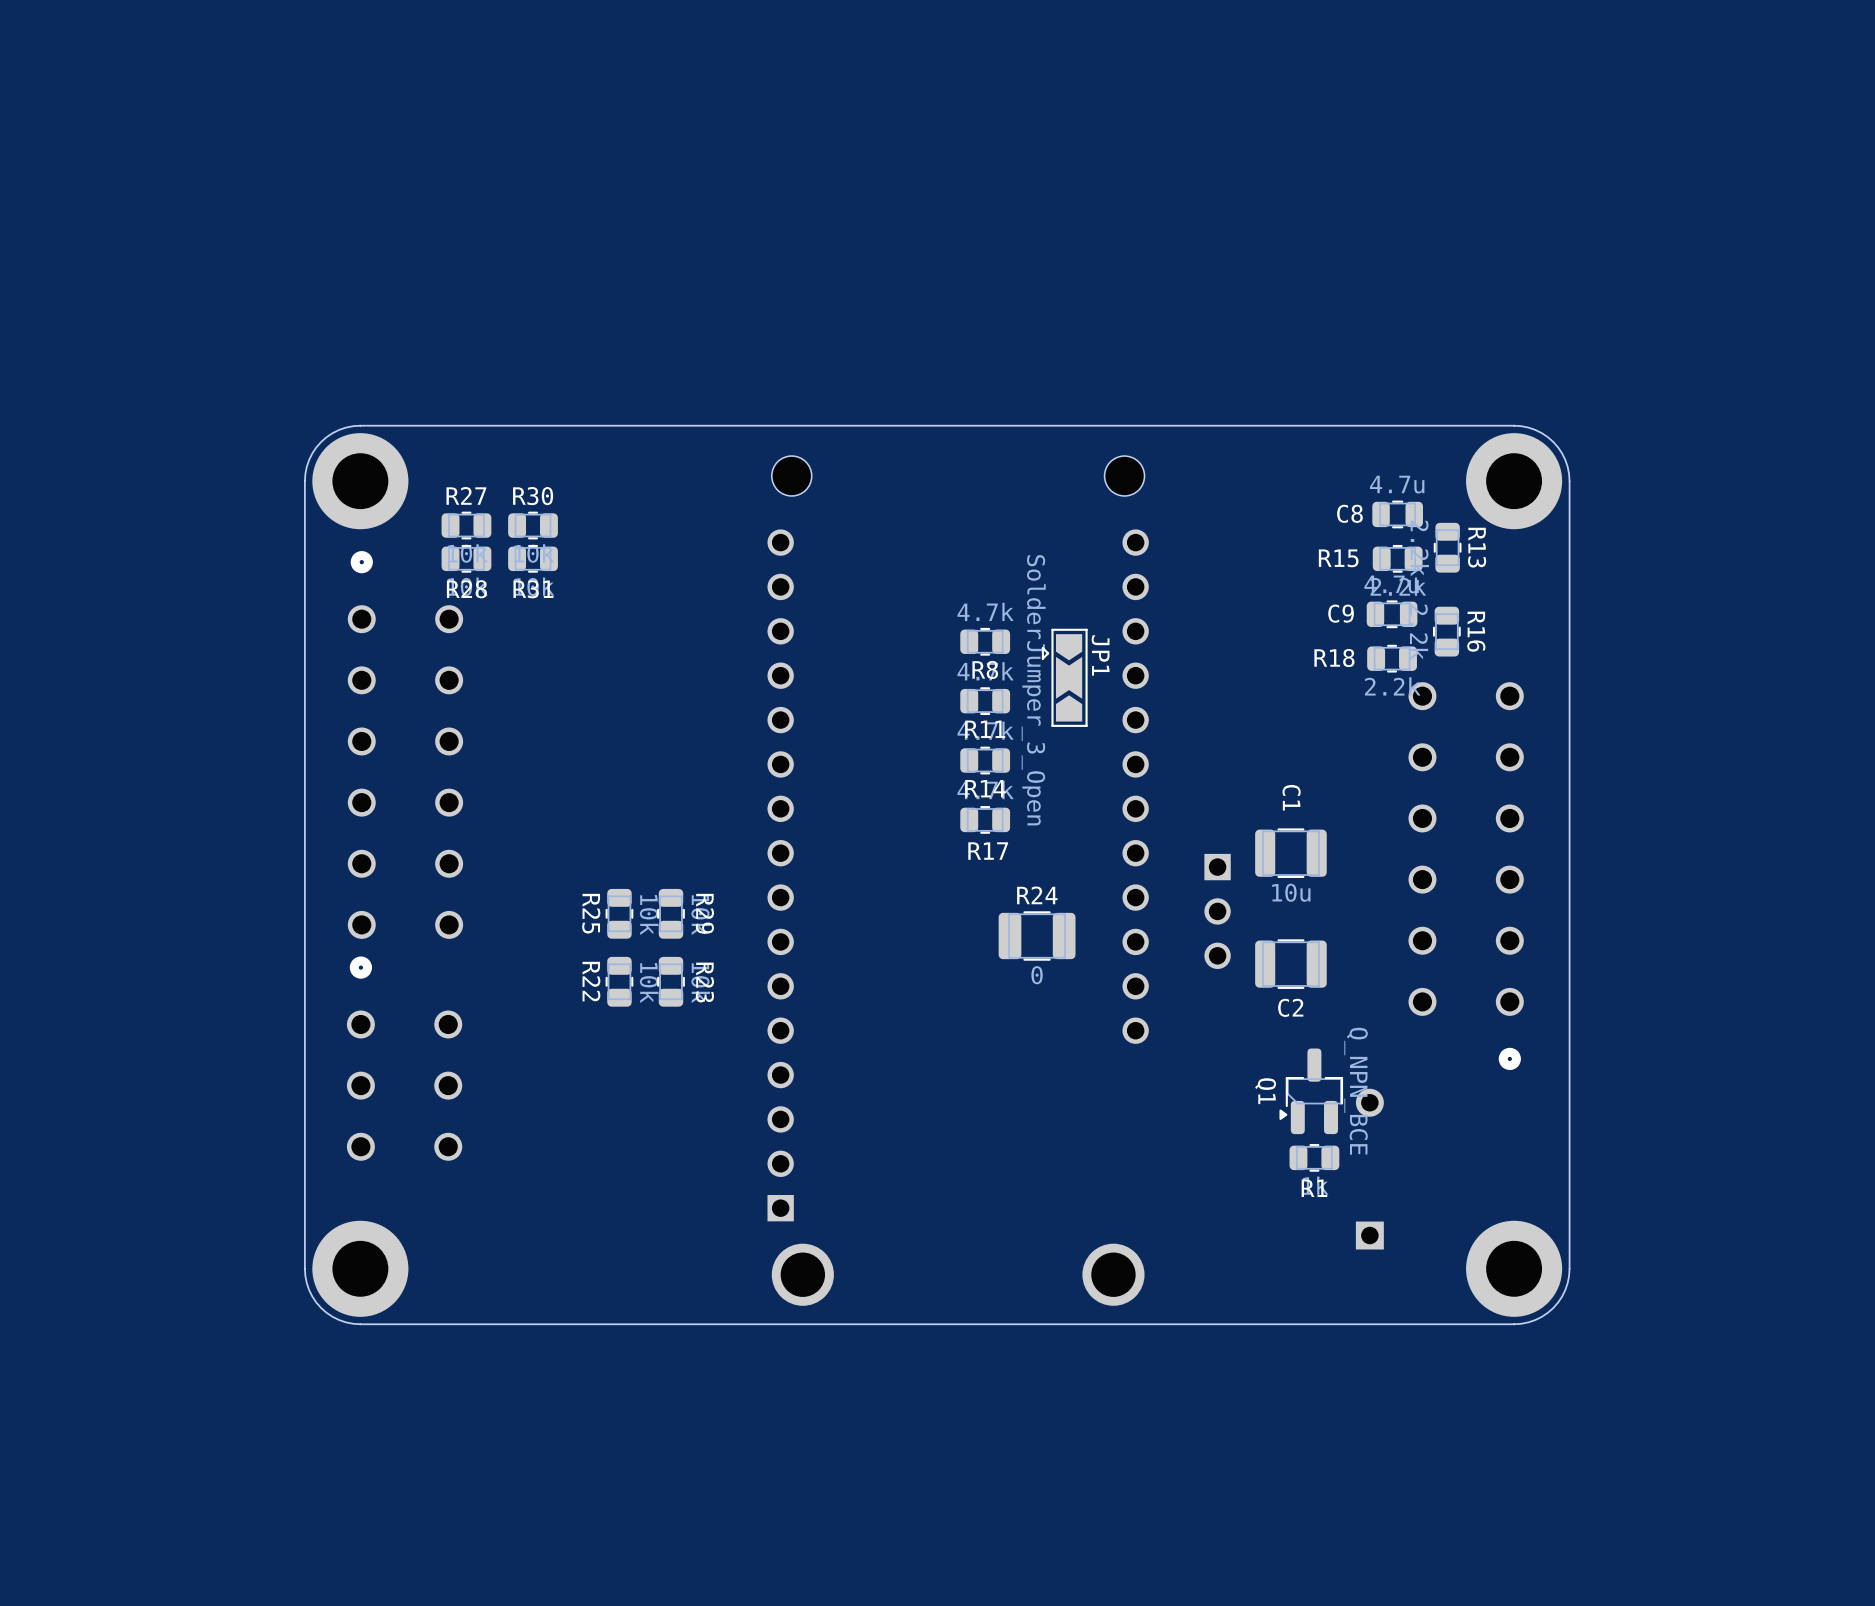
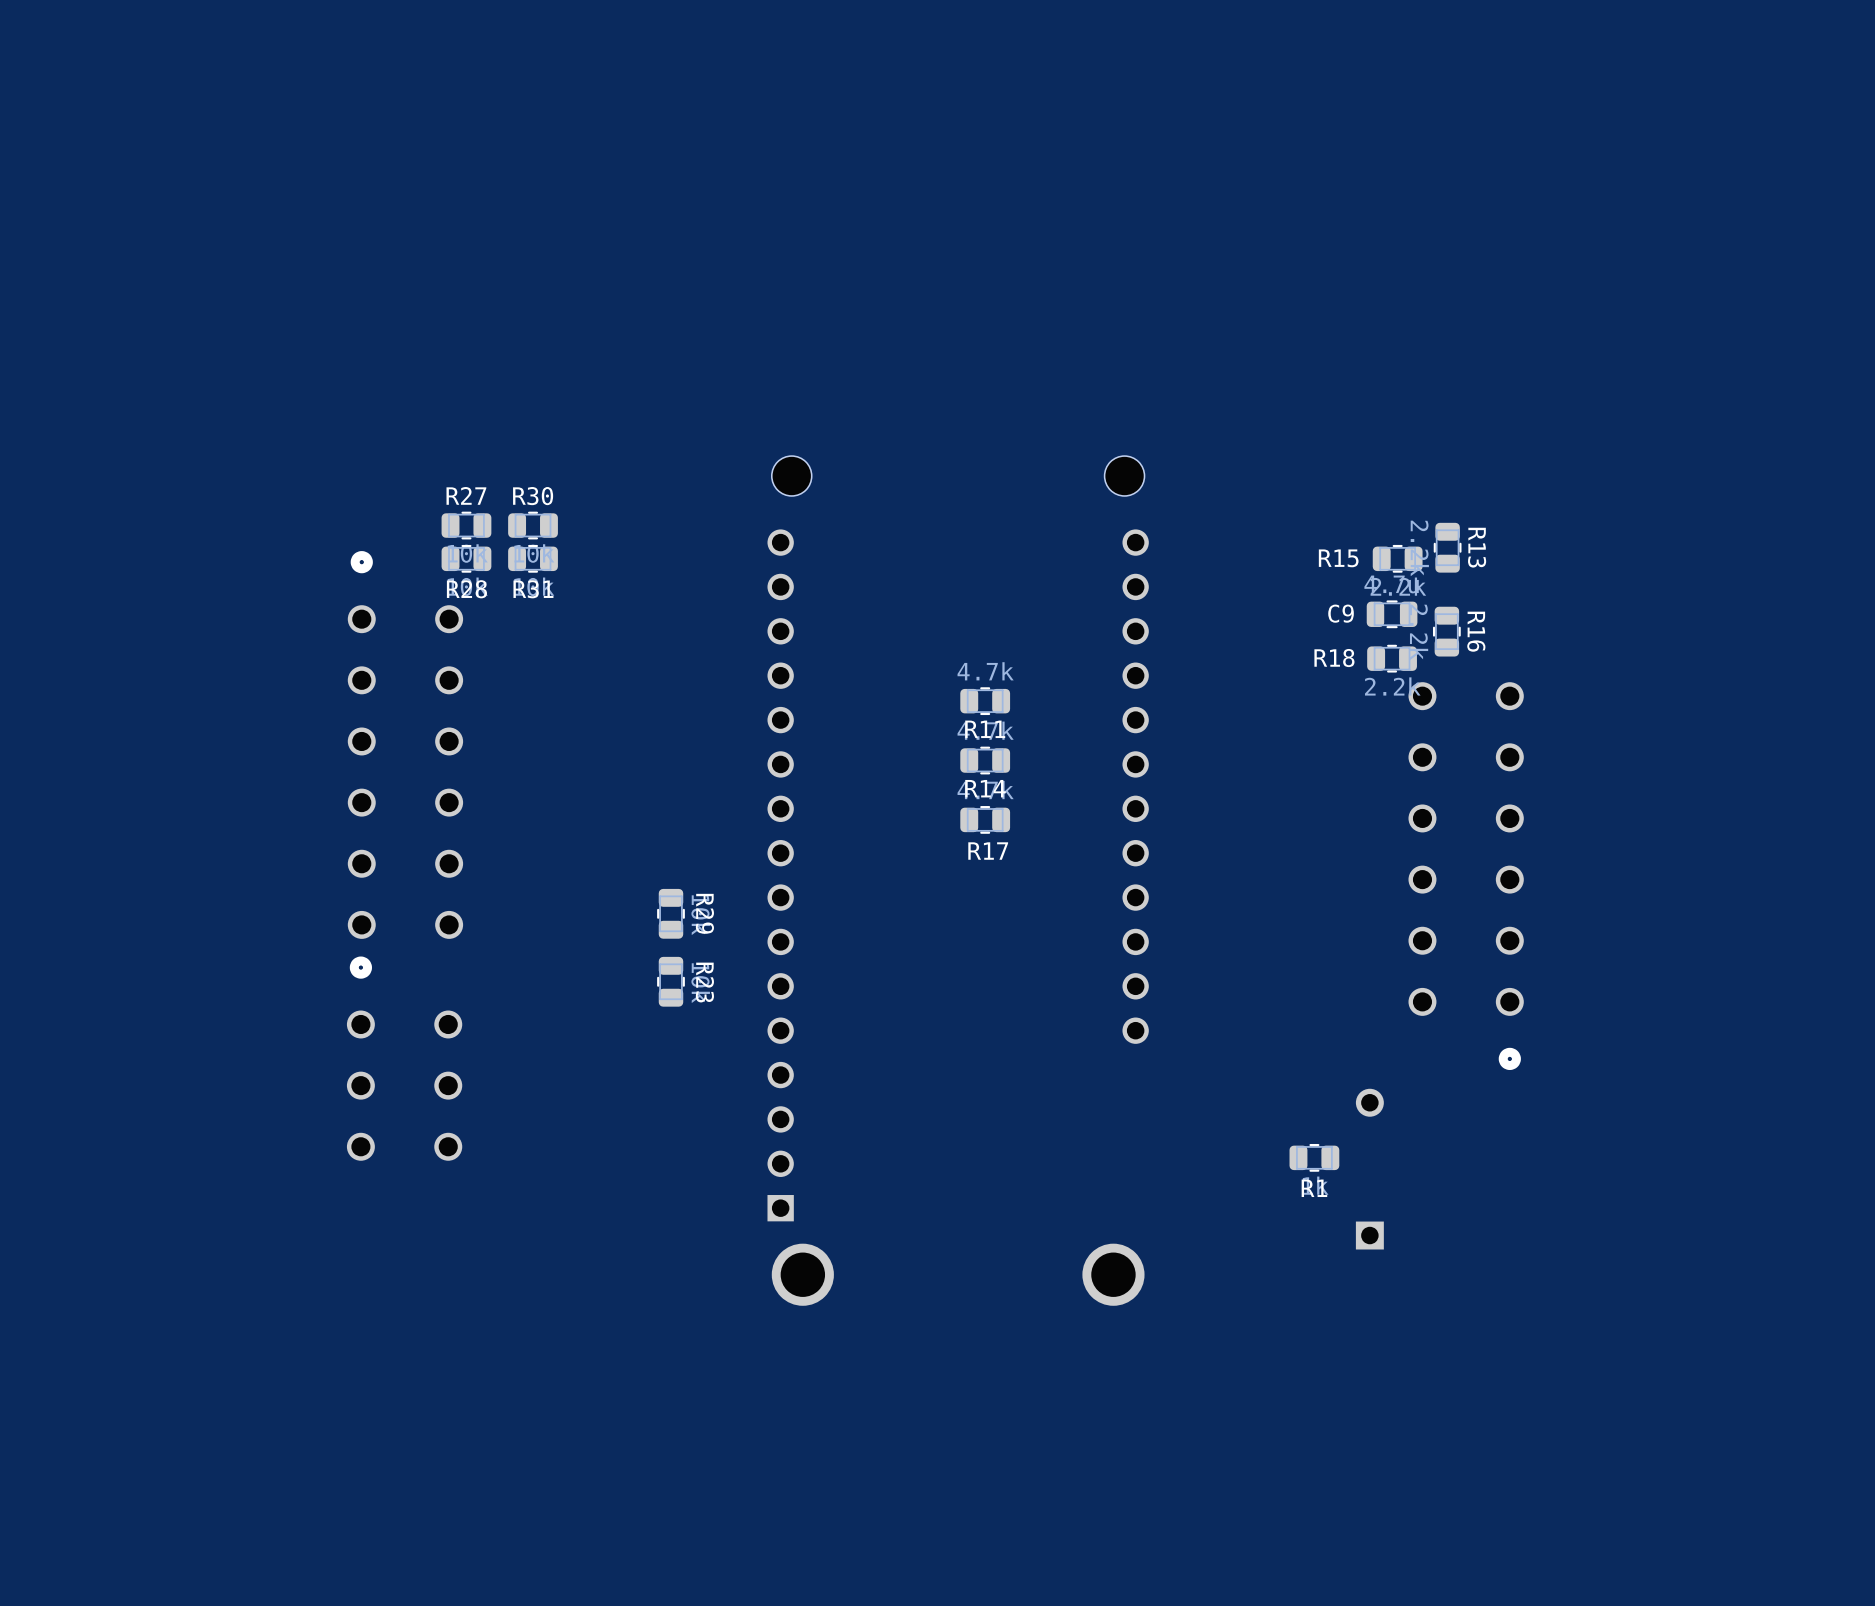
board edge: (1514, 425) (360, 425) (346, 427) (326, 437) (316, 447) (309, 459) (304, 481) (304, 1268) (306, 1283) (316, 1302) (332, 1316) (346, 1322) (360, 1324) (1514, 1324) (1528, 1322) (1547, 1312) (1562, 1296) (1567, 1283) (1569, 1268) (1569, 481) (1565, 459) (1553, 441) (1535, 429) (1514, 425) -> none
part: (360, 481) -> none
part: (1514, 481) -> none
C8: 4.7u (1397, 514) -> none
R8: 4.7k (985, 641) -> none
JP1: SolderJumper_3_Open (1064, 677) -> none
C1: 10u (1290, 853) -> none
part: (1217, 911) -> none
R25: 10k (619, 913) -> none
R24: 0 (1037, 936) -> none
C2: (1290, 964) -> none
R22: 10k (619, 981) -> none
Q1: Q_NPN_BCE (1311, 1091) -> none
part: (360, 1268) -> none
part: (1514, 1268) -> none

